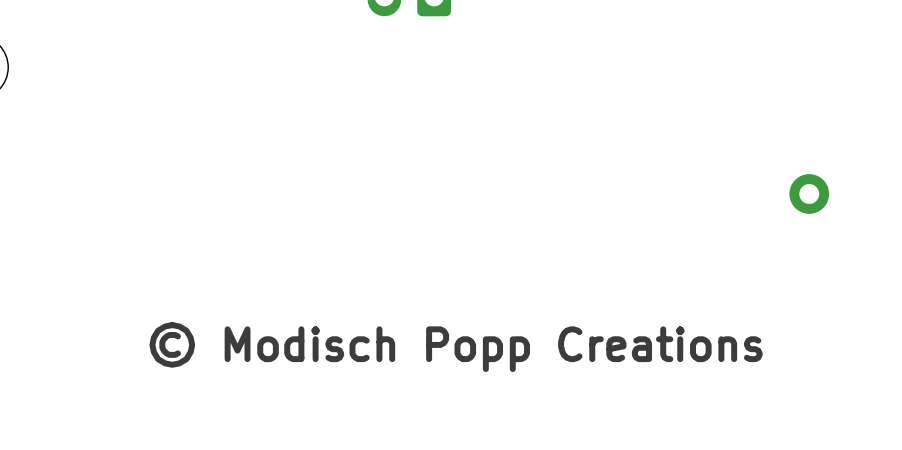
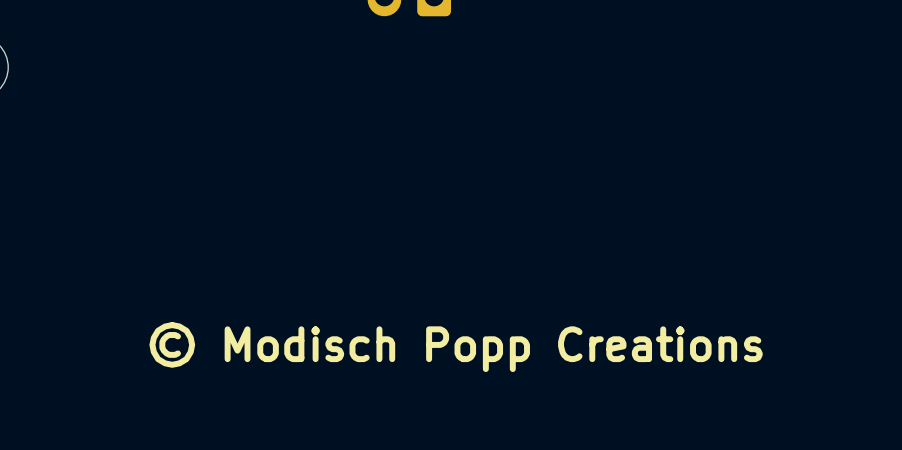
part: (809, 193) -> none

